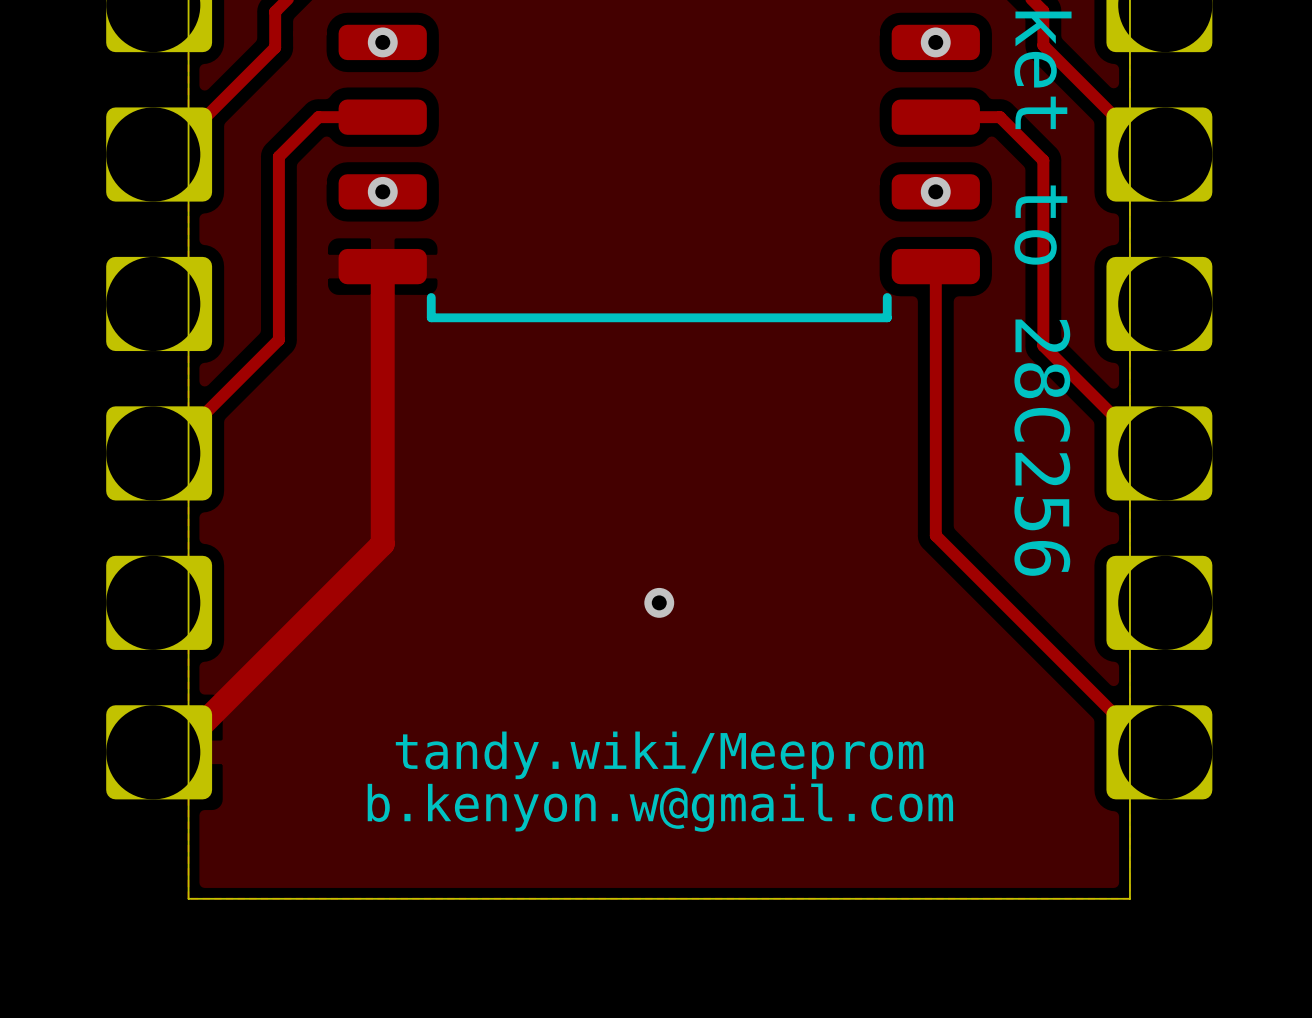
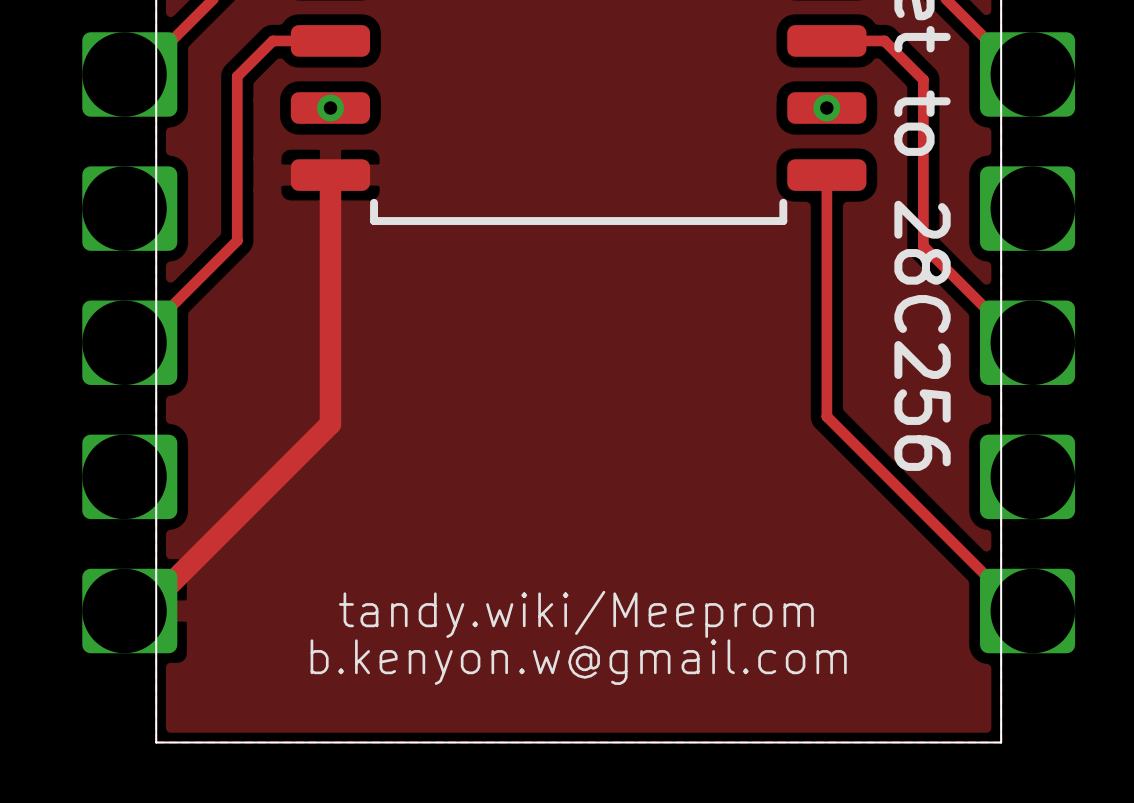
via: (659, 602) -> none

